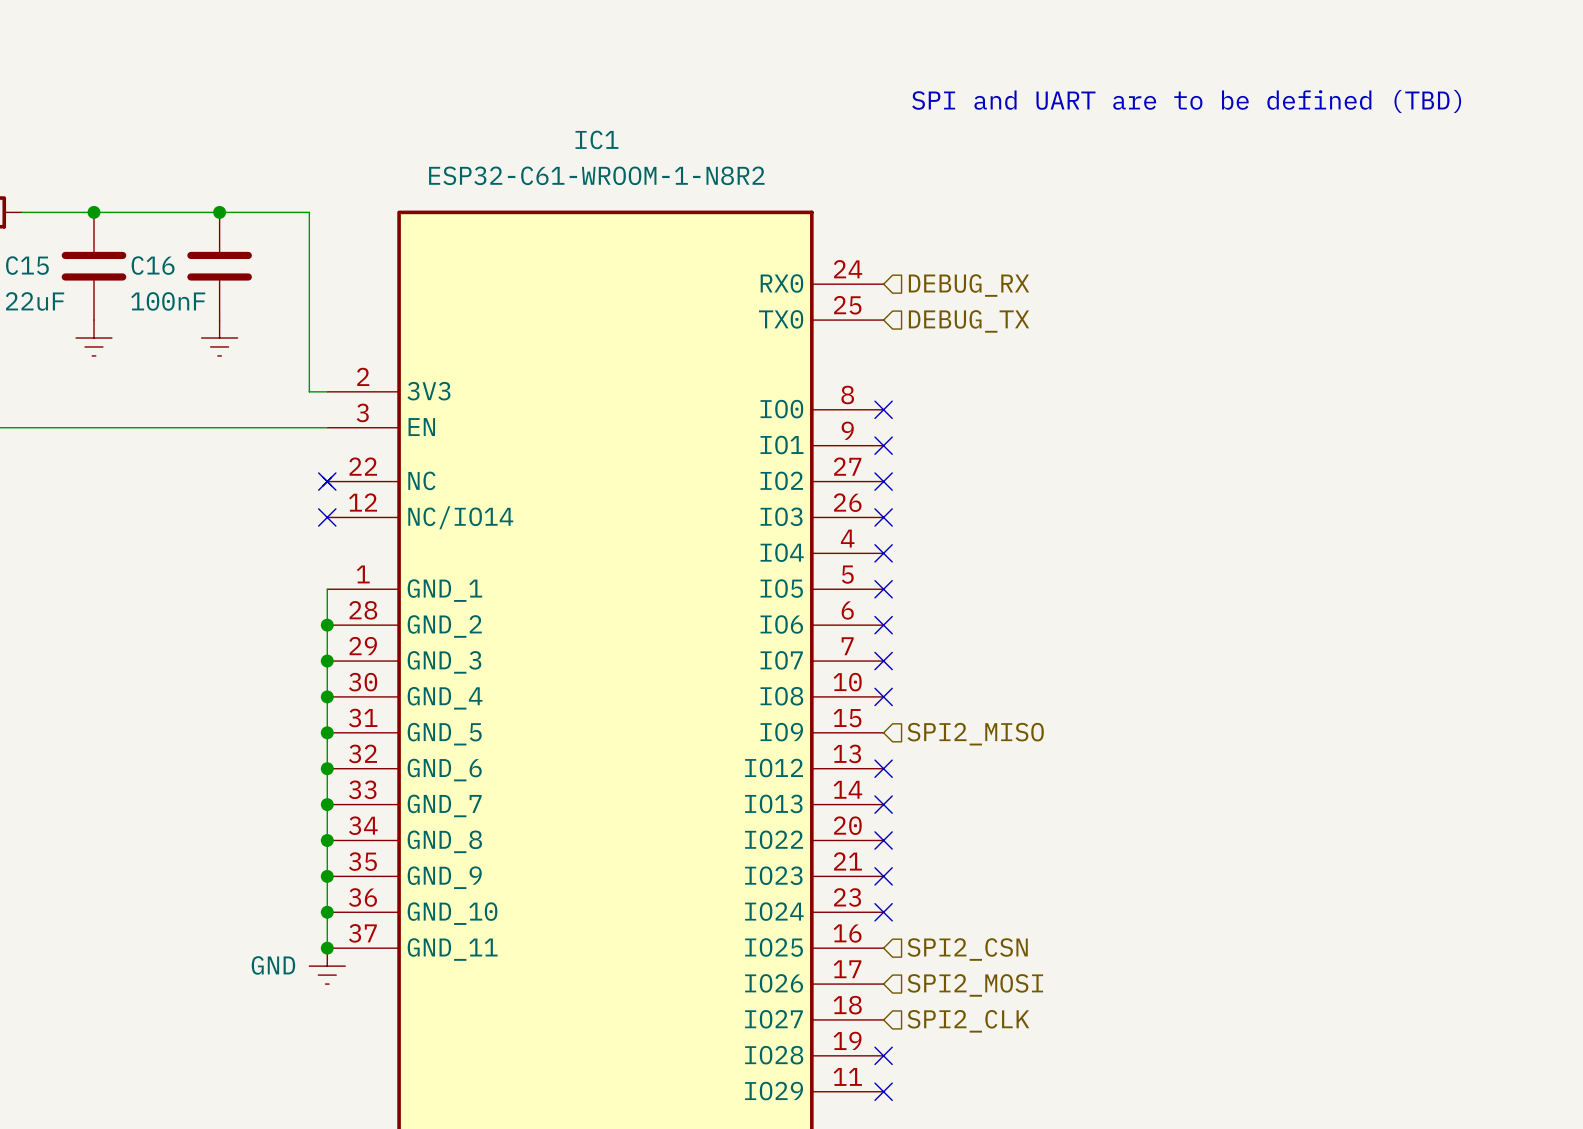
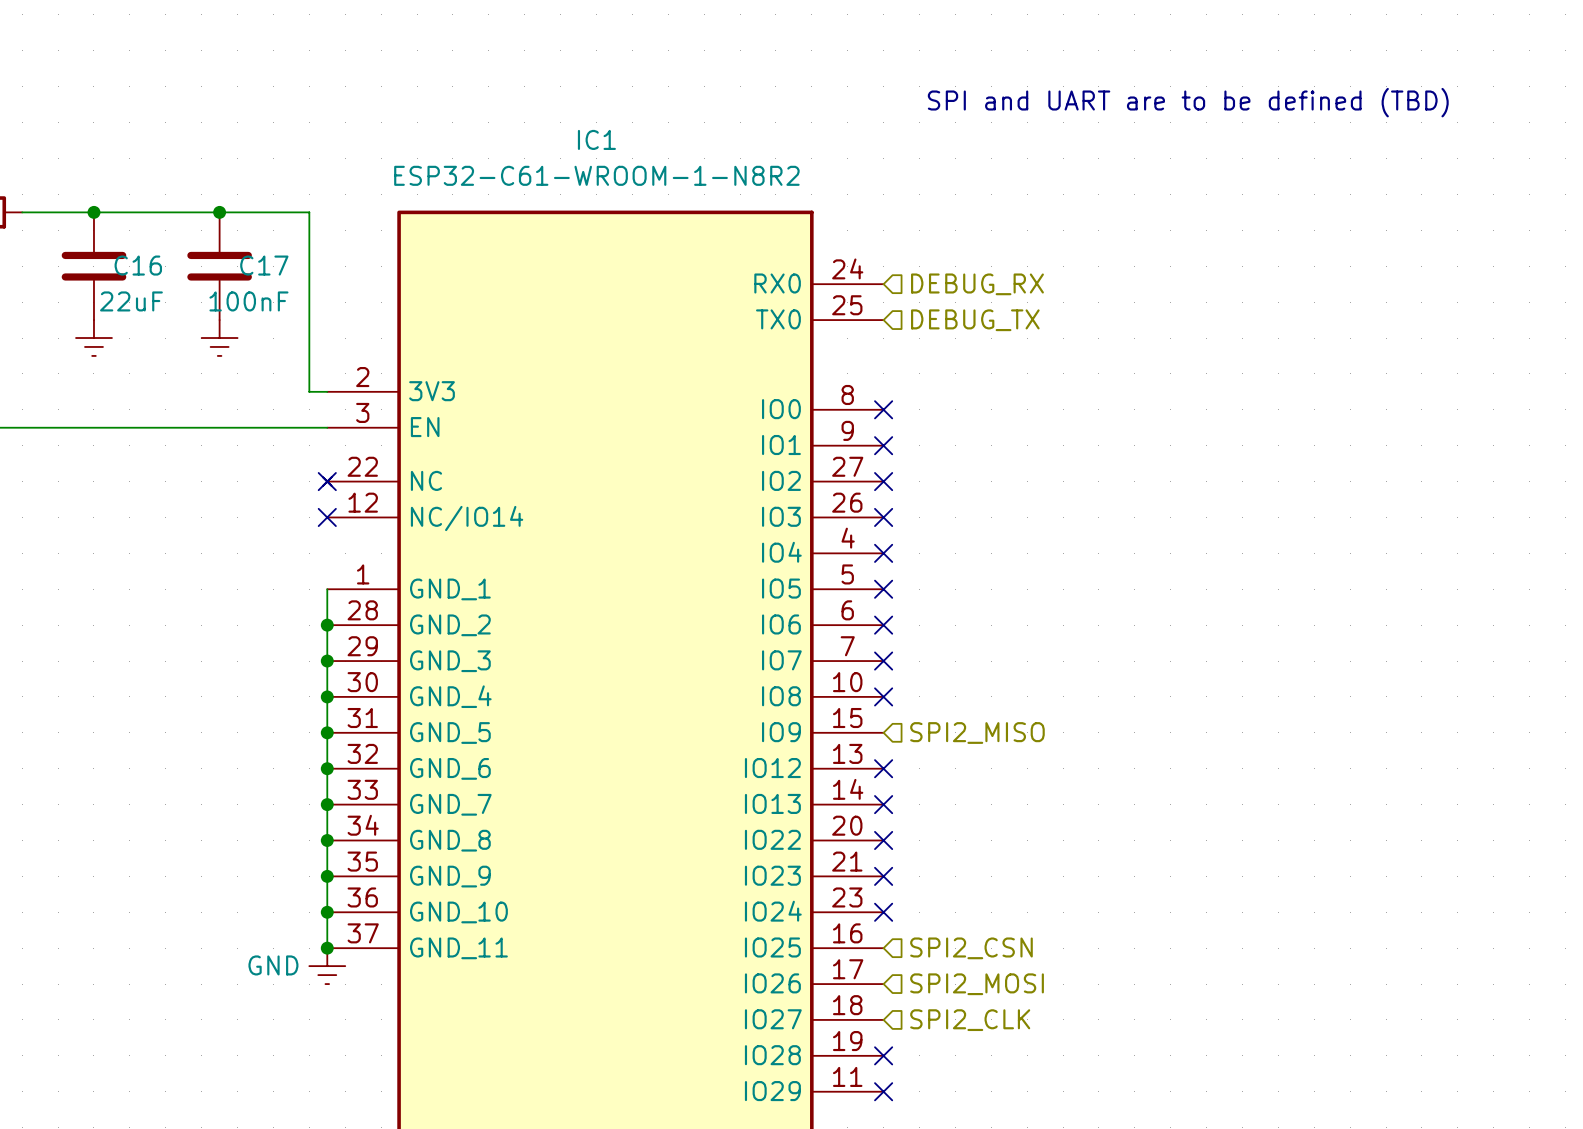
C15 name: C15 (27, 265) -> C16 (138, 265)
C16 name: C16 (153, 265) -> C17 (264, 265)
C15 value position: 22uF (35, 301) -> 22uF (131, 301)
C16 value position: 100nF (168, 301) -> 100nF (248, 301)

